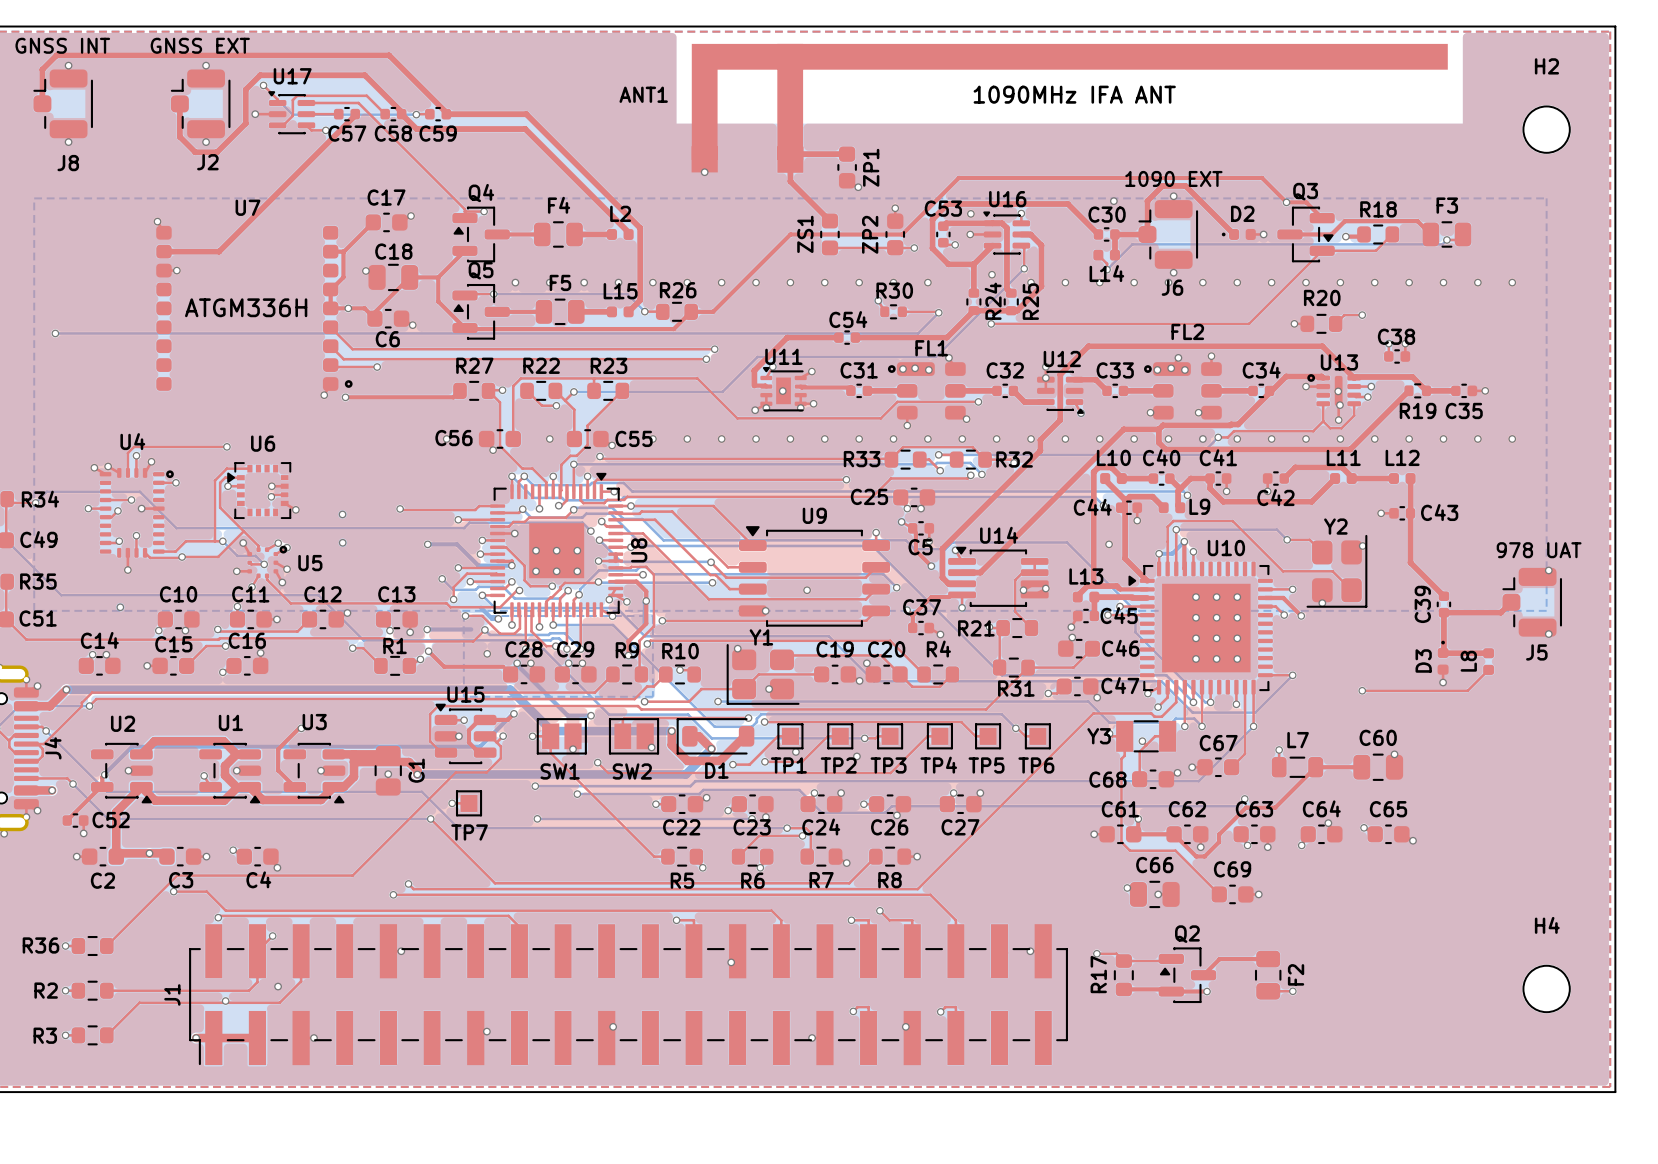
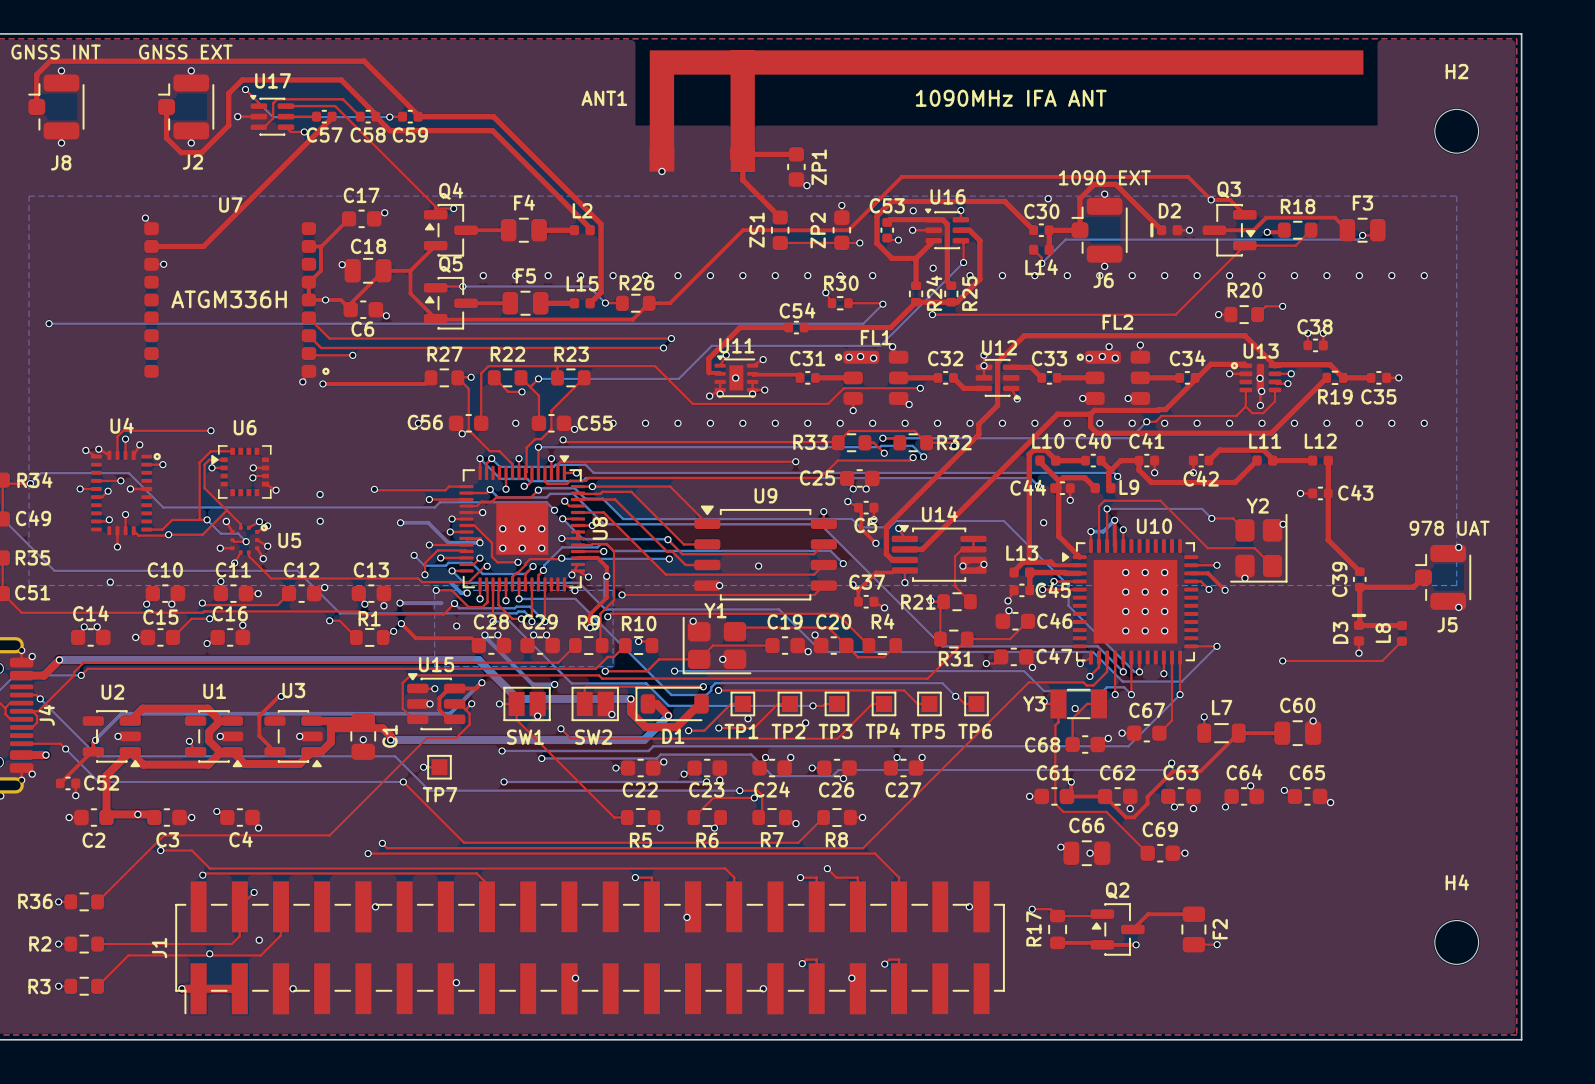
D2 footprint: [1221, 228, 1256, 240] -> [1156, 225, 1183, 236]
line: none -> (1151, 224) (1151, 235)
D3 footprint: [1437, 640, 1449, 675] -> [1353, 620, 1365, 646]
line: none -> (1353, 615) (1364, 615)

